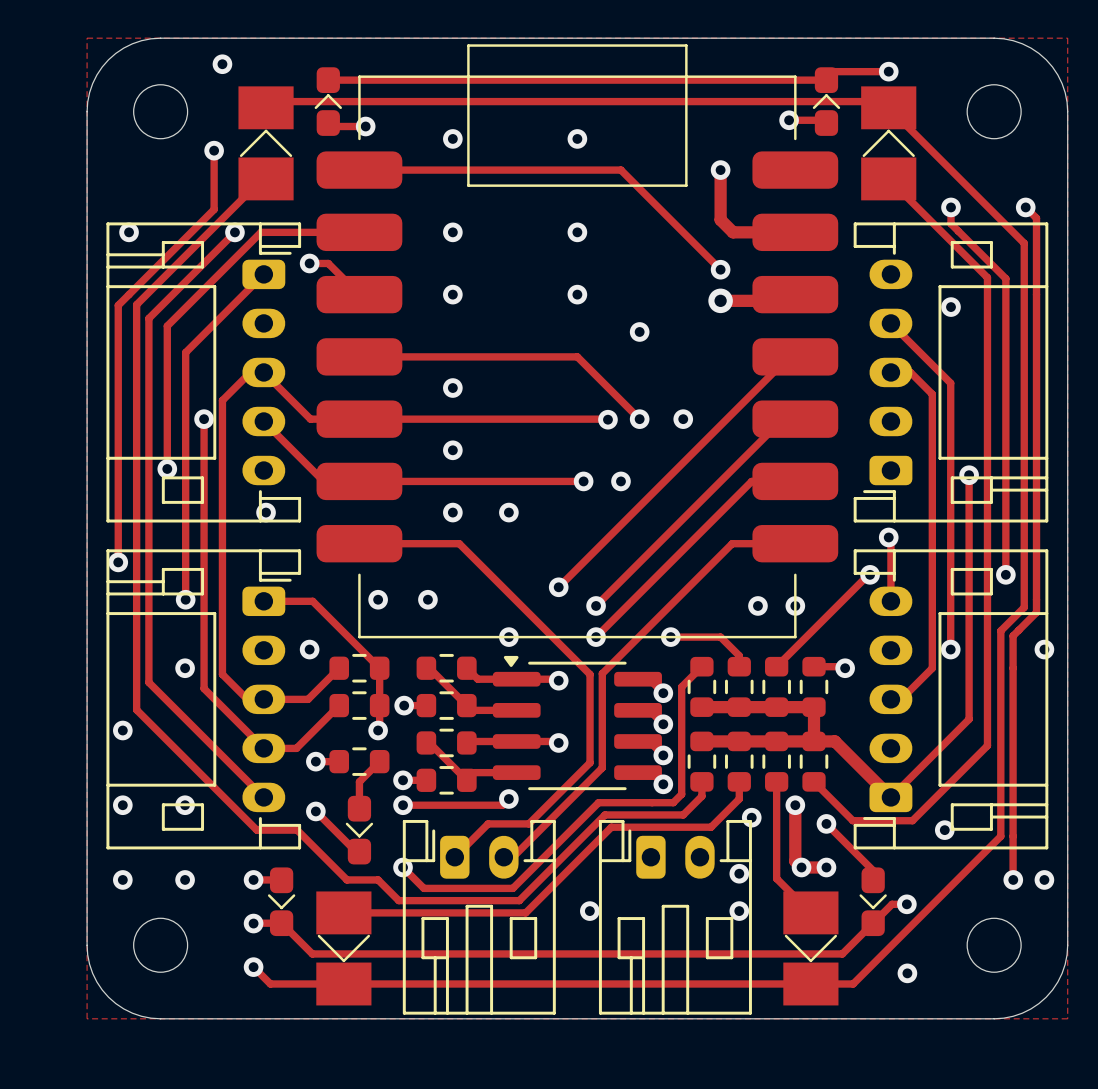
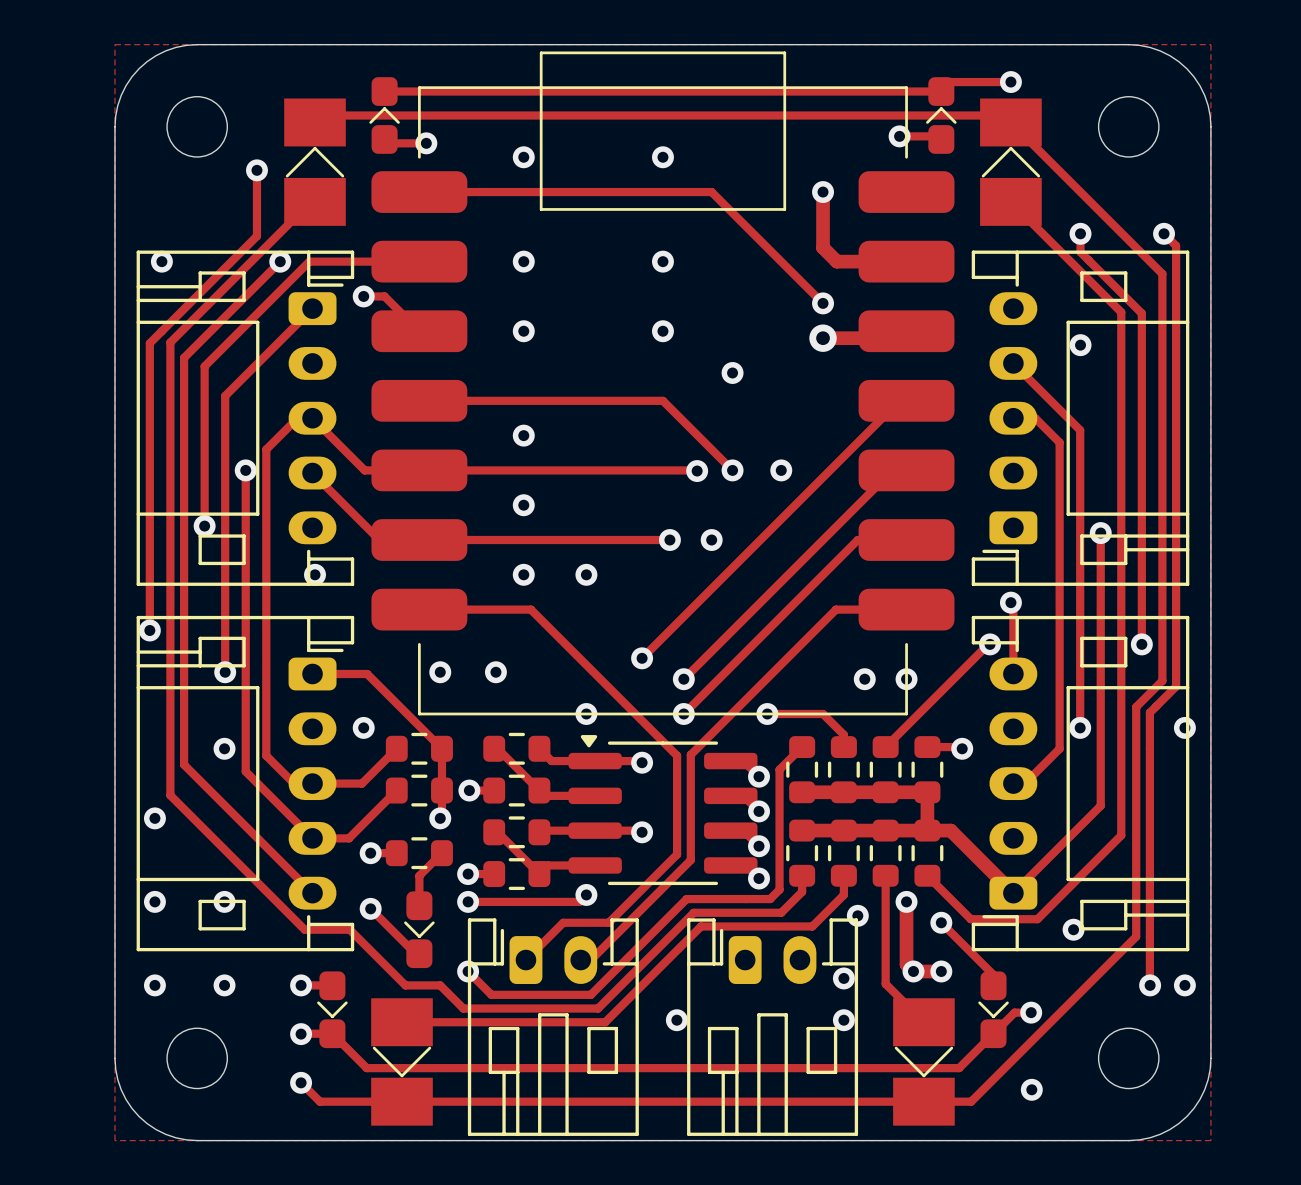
via: (222, 64) -> none

